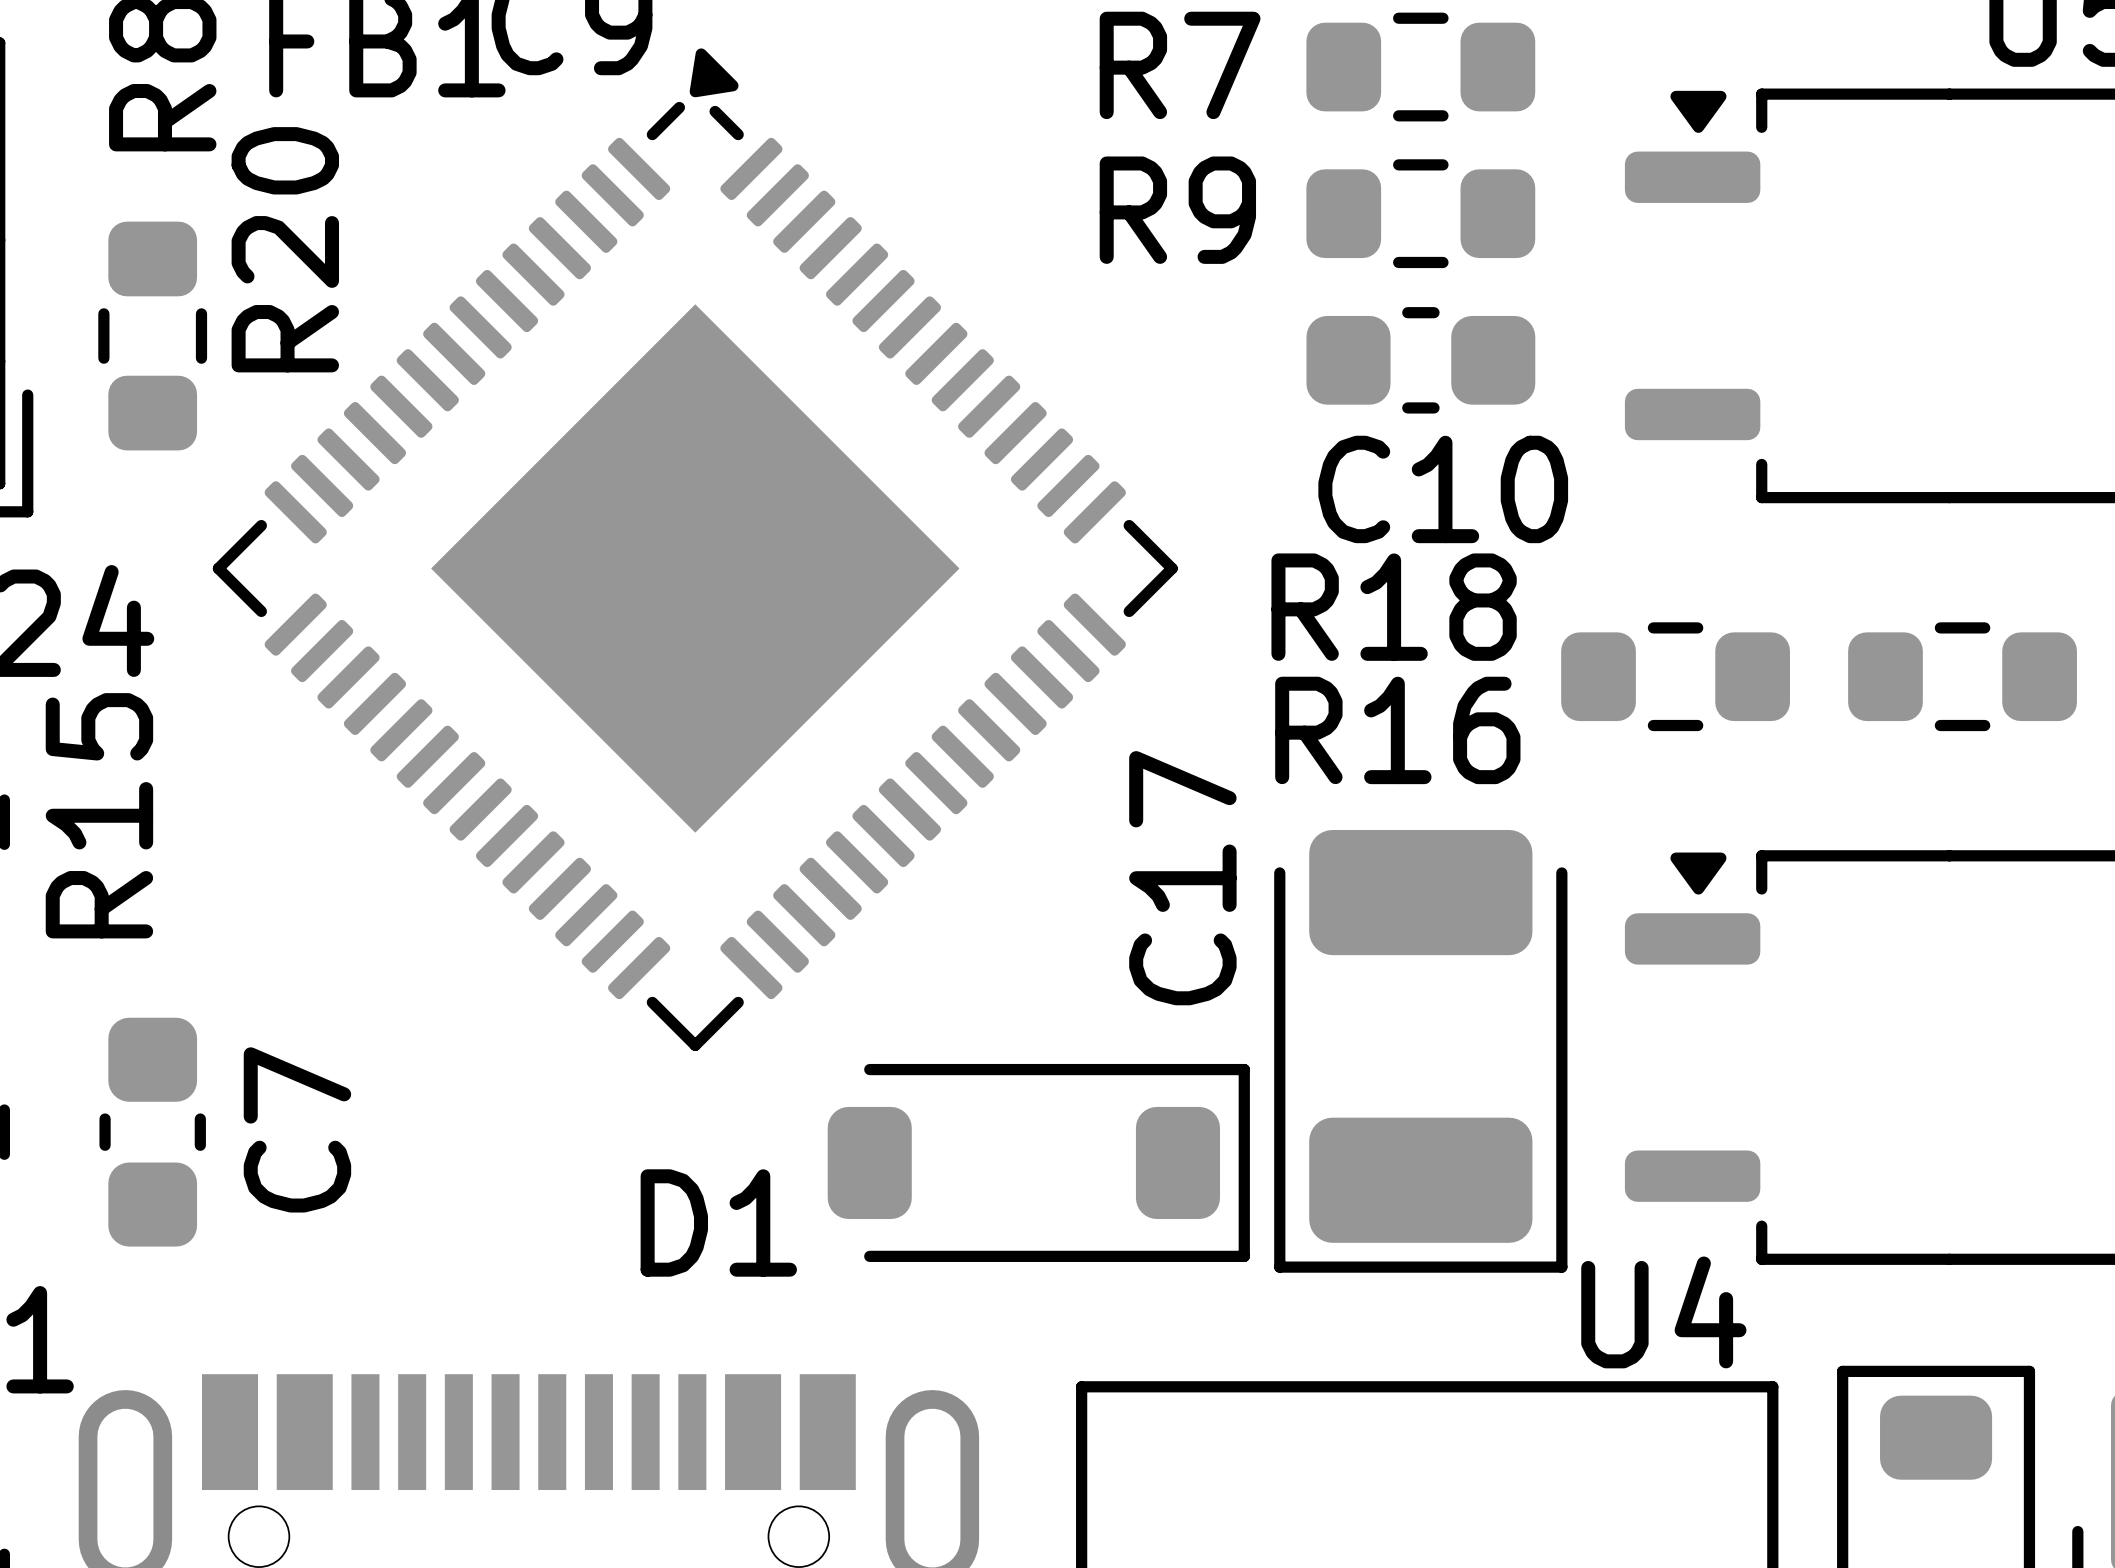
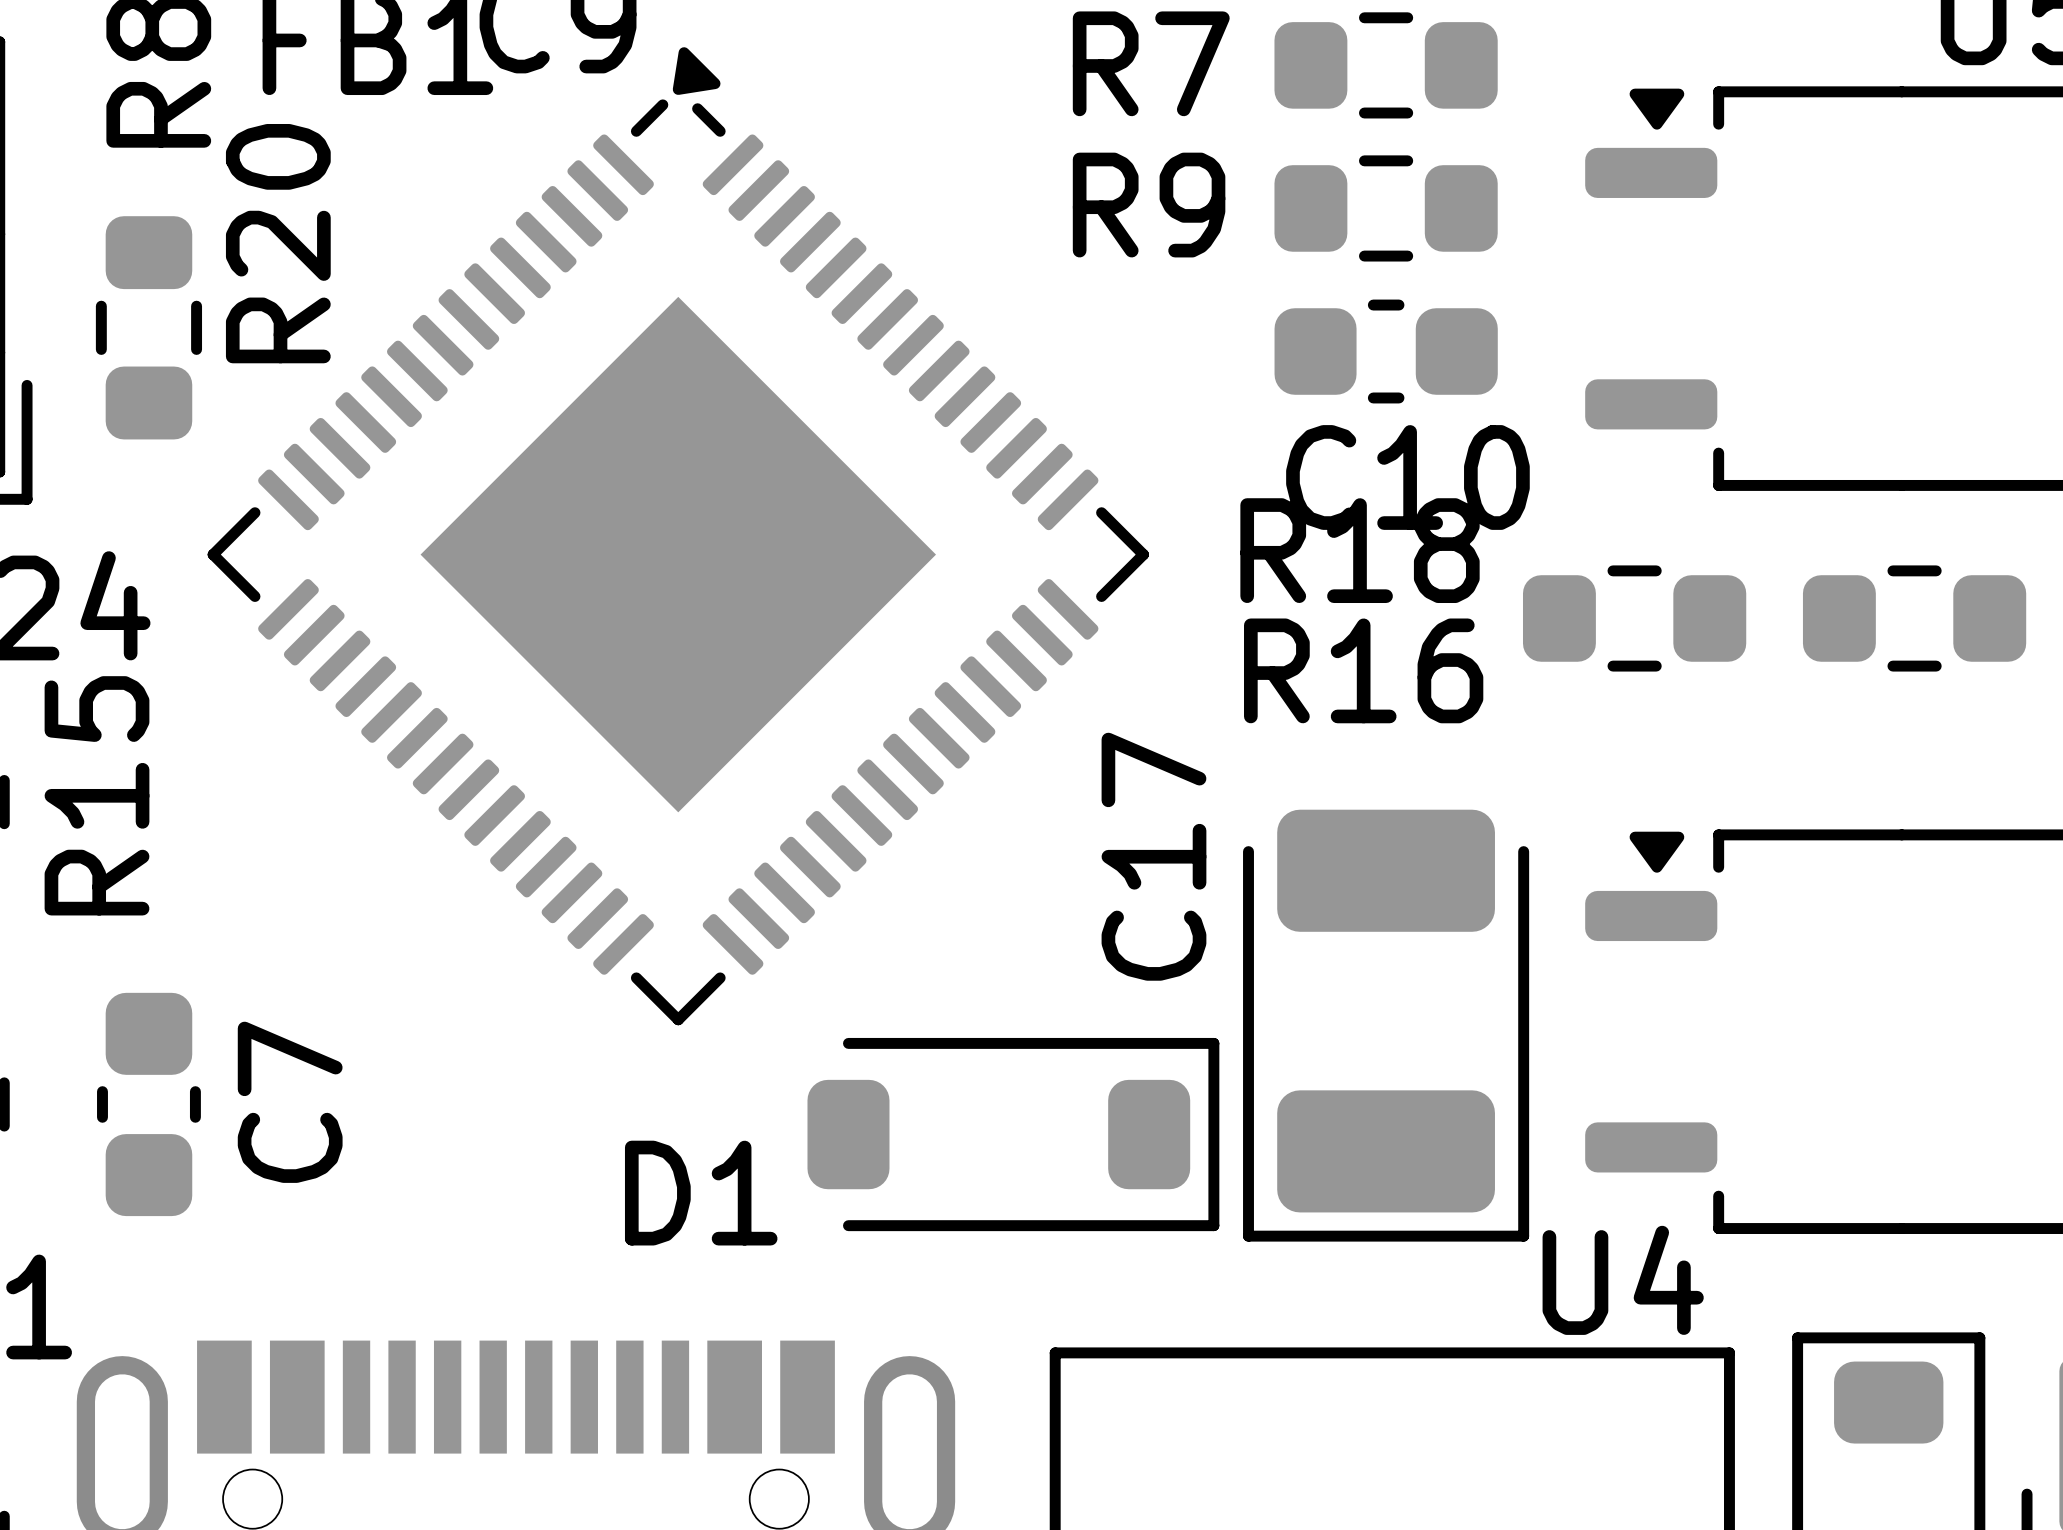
R18 position: (1675, 676) -> (1634, 618)
R16 position: (1962, 676) -> (1914, 618)

